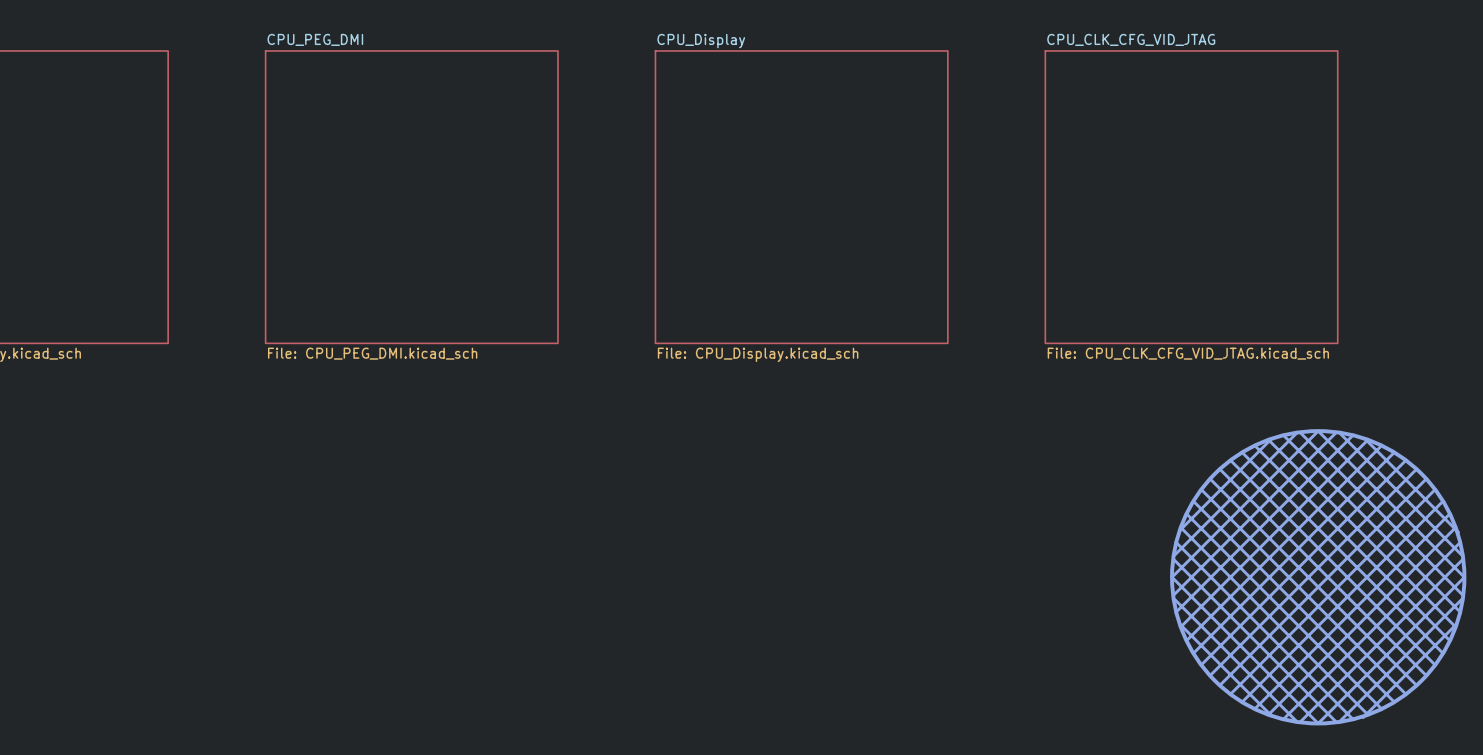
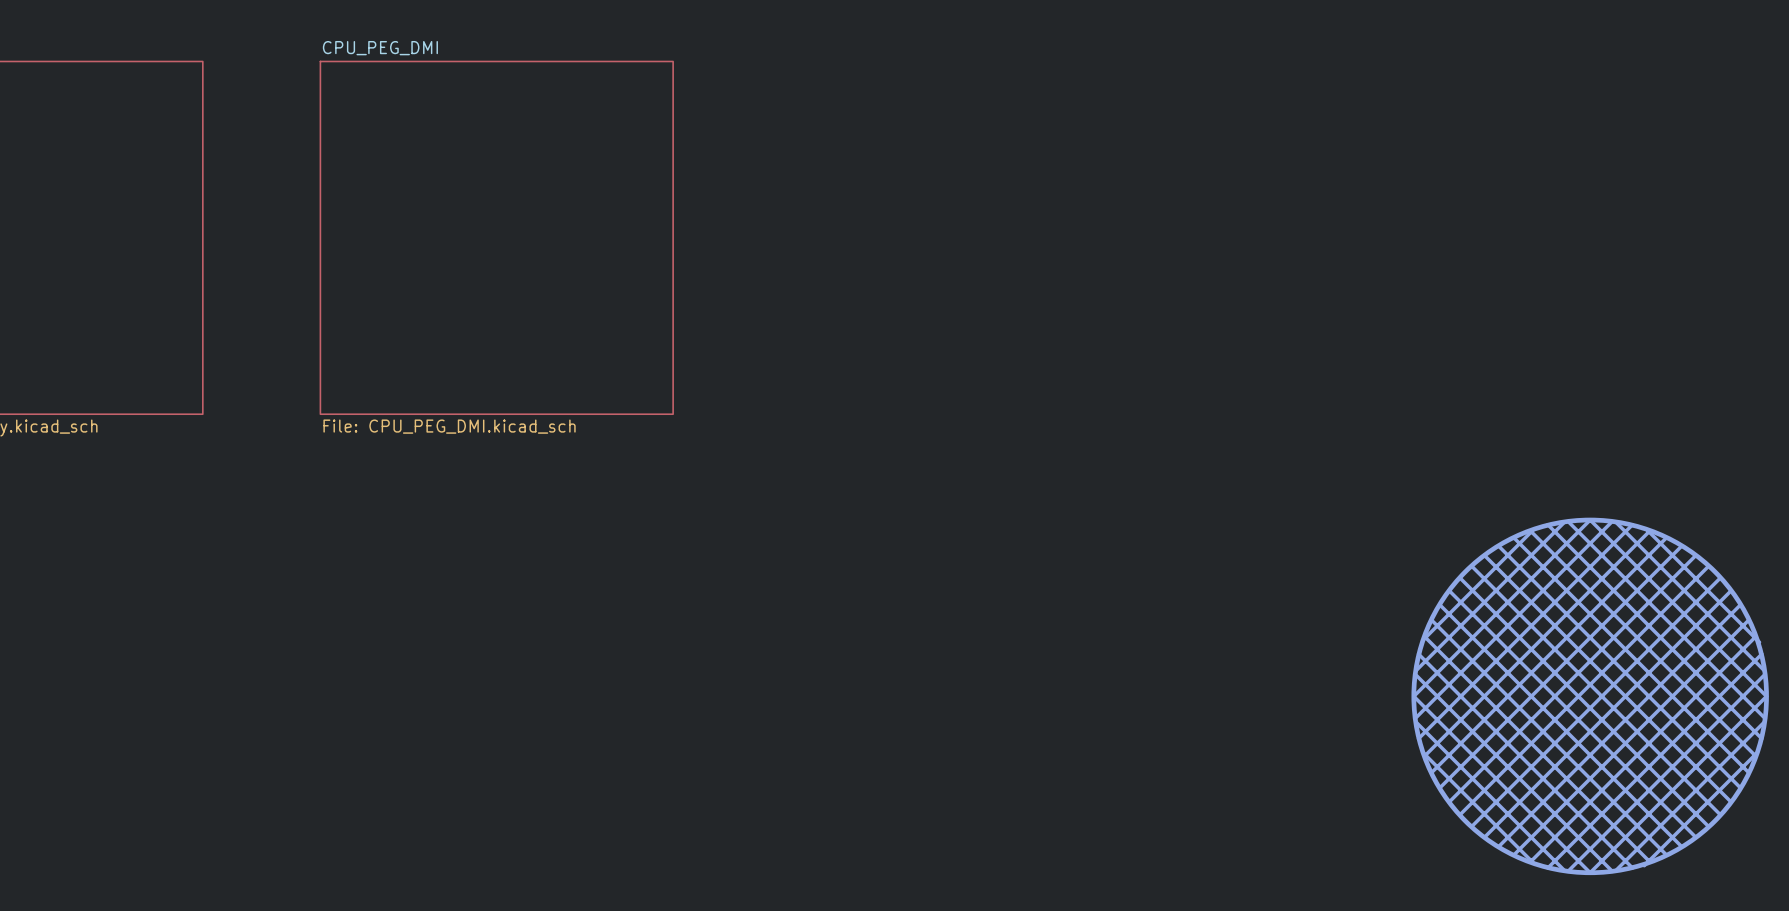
sheet CPU_Display: File: CPU_Display.kicad_sch (801, 197) -> none
sheet CPU_CLK_CFG_VID_JTAG: File: CPU_CLK_CFG_VID_JTAG.kicad_sch (1191, 197) -> none

